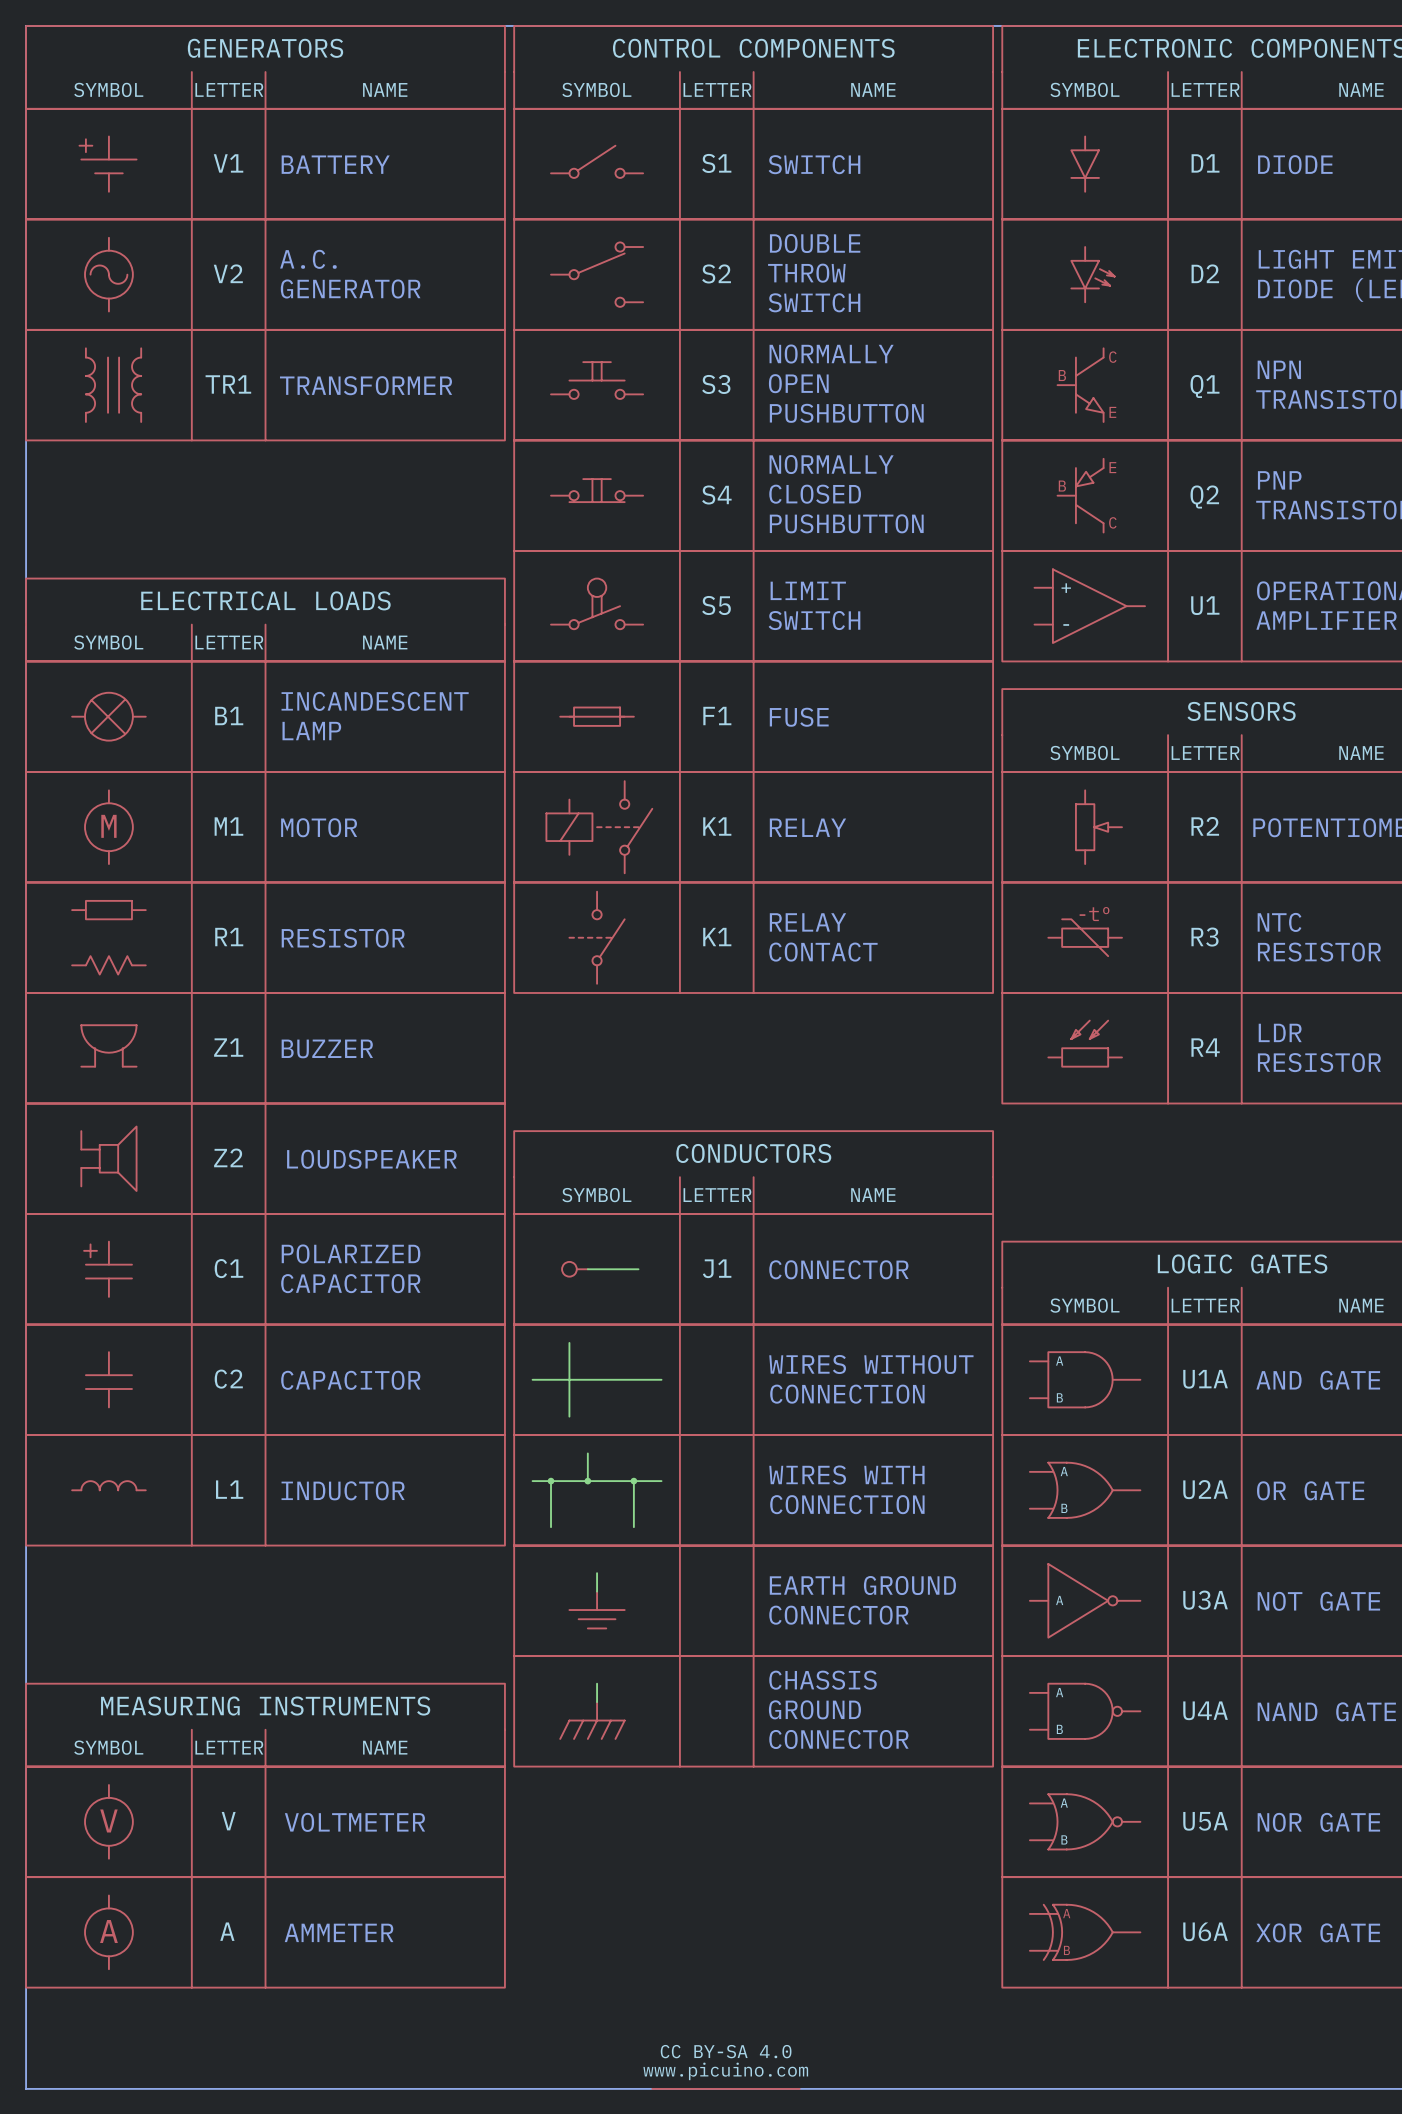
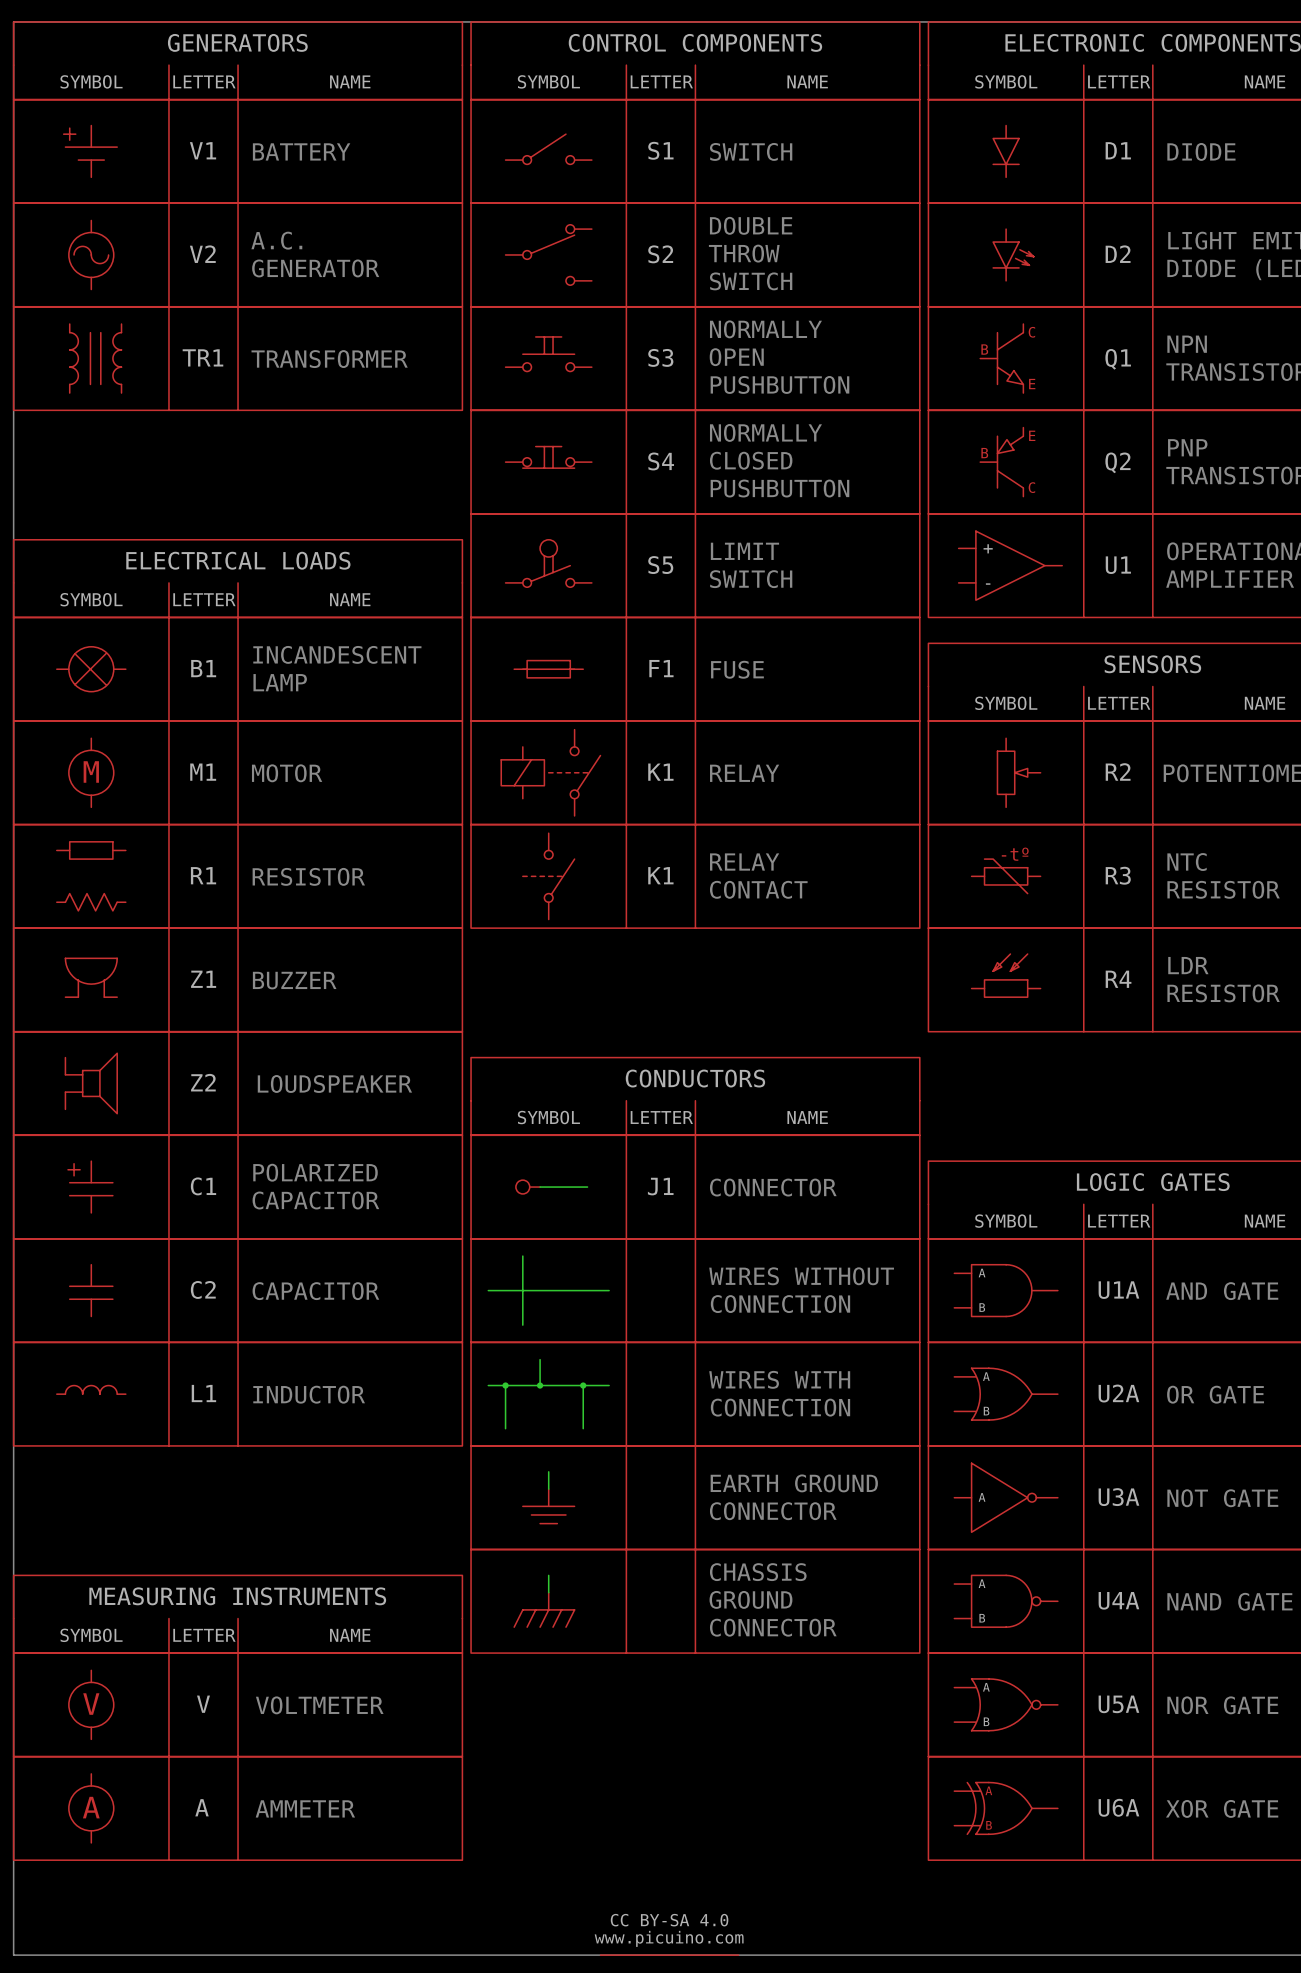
part symbol: [72, 956, 146, 975] -> [56, 893, 126, 911]

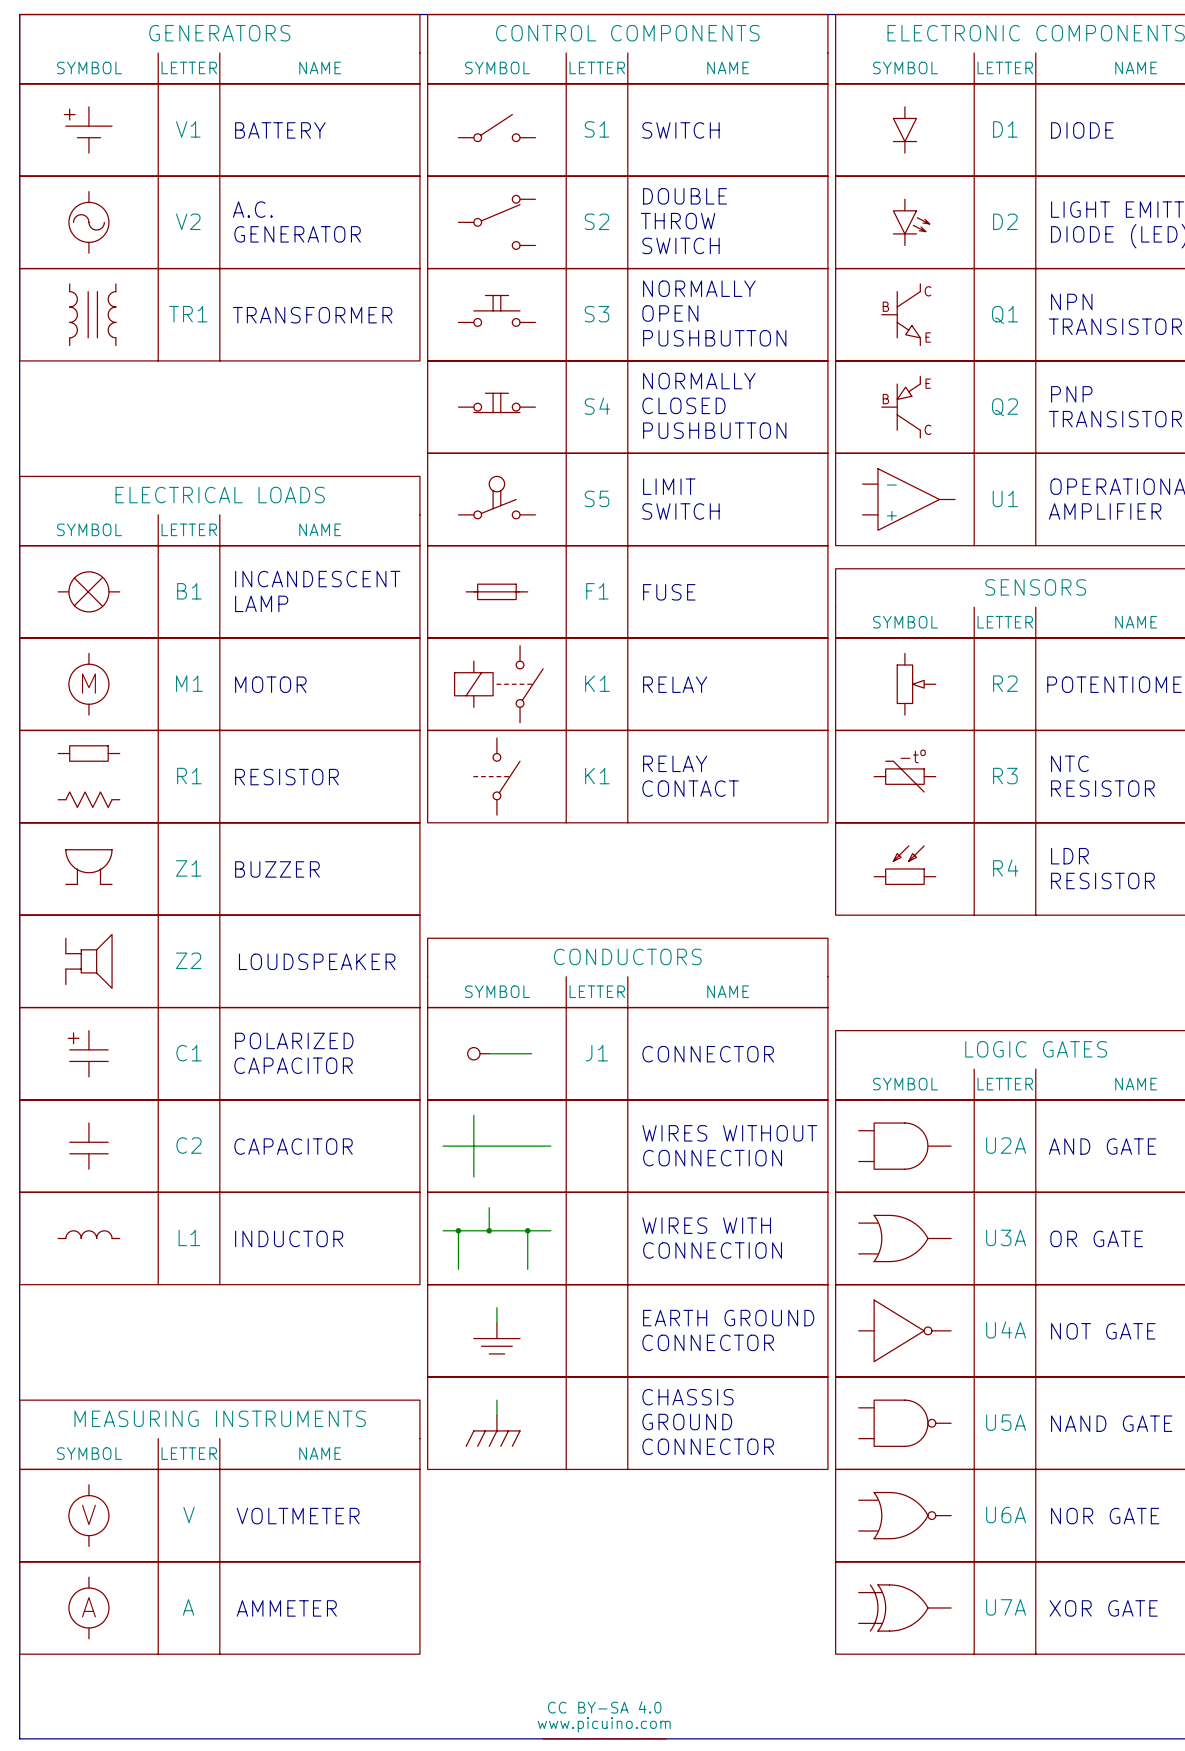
U1 flip: as is (1010, 565) -> up-down (908, 499)
U1A: (1006, 1290) -> none
U2A symbol: [954, 1368, 1058, 1421] -> [858, 1123, 952, 1170]
U3A symbol: [954, 1463, 1058, 1533] -> [858, 1215, 952, 1262]
U4A symbol: [954, 1575, 1058, 1628] -> [858, 1300, 952, 1362]
U5A symbol: [954, 1678, 1058, 1731] -> [858, 1400, 952, 1447]
U6A symbol: [954, 1782, 1058, 1835] -> [858, 1492, 952, 1539]
U7A: none -> (904, 1607)

